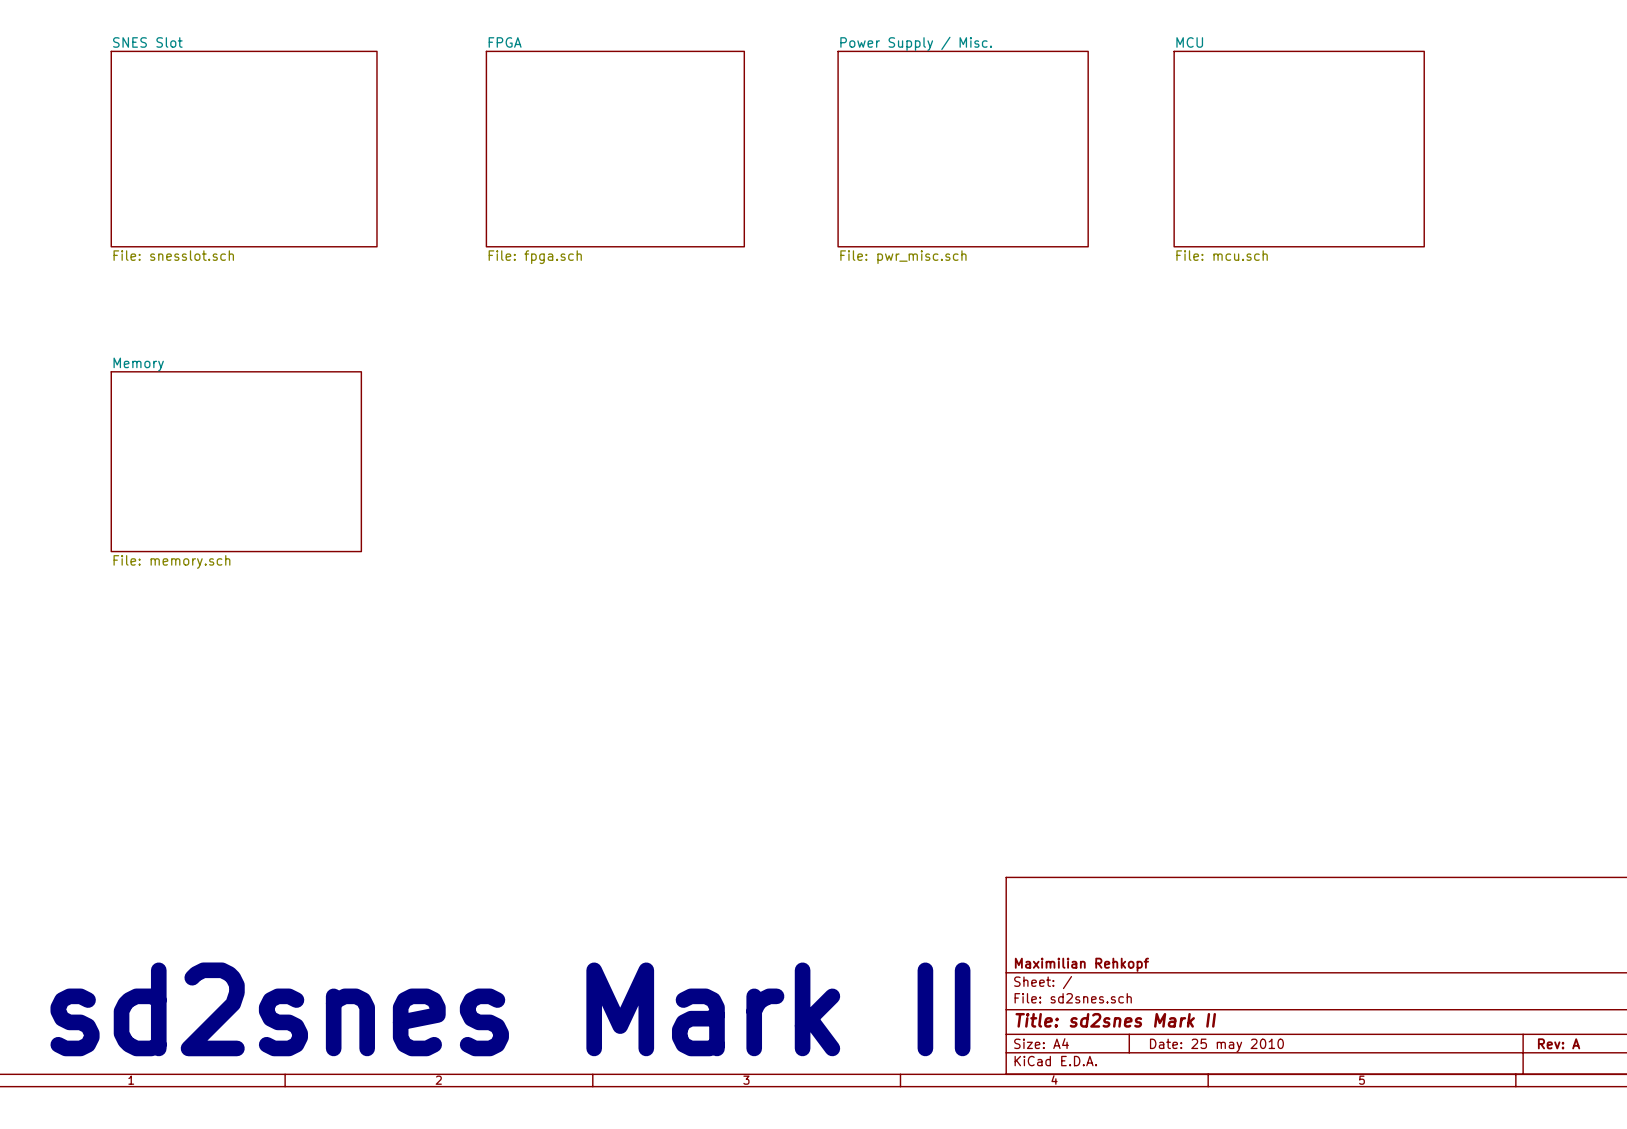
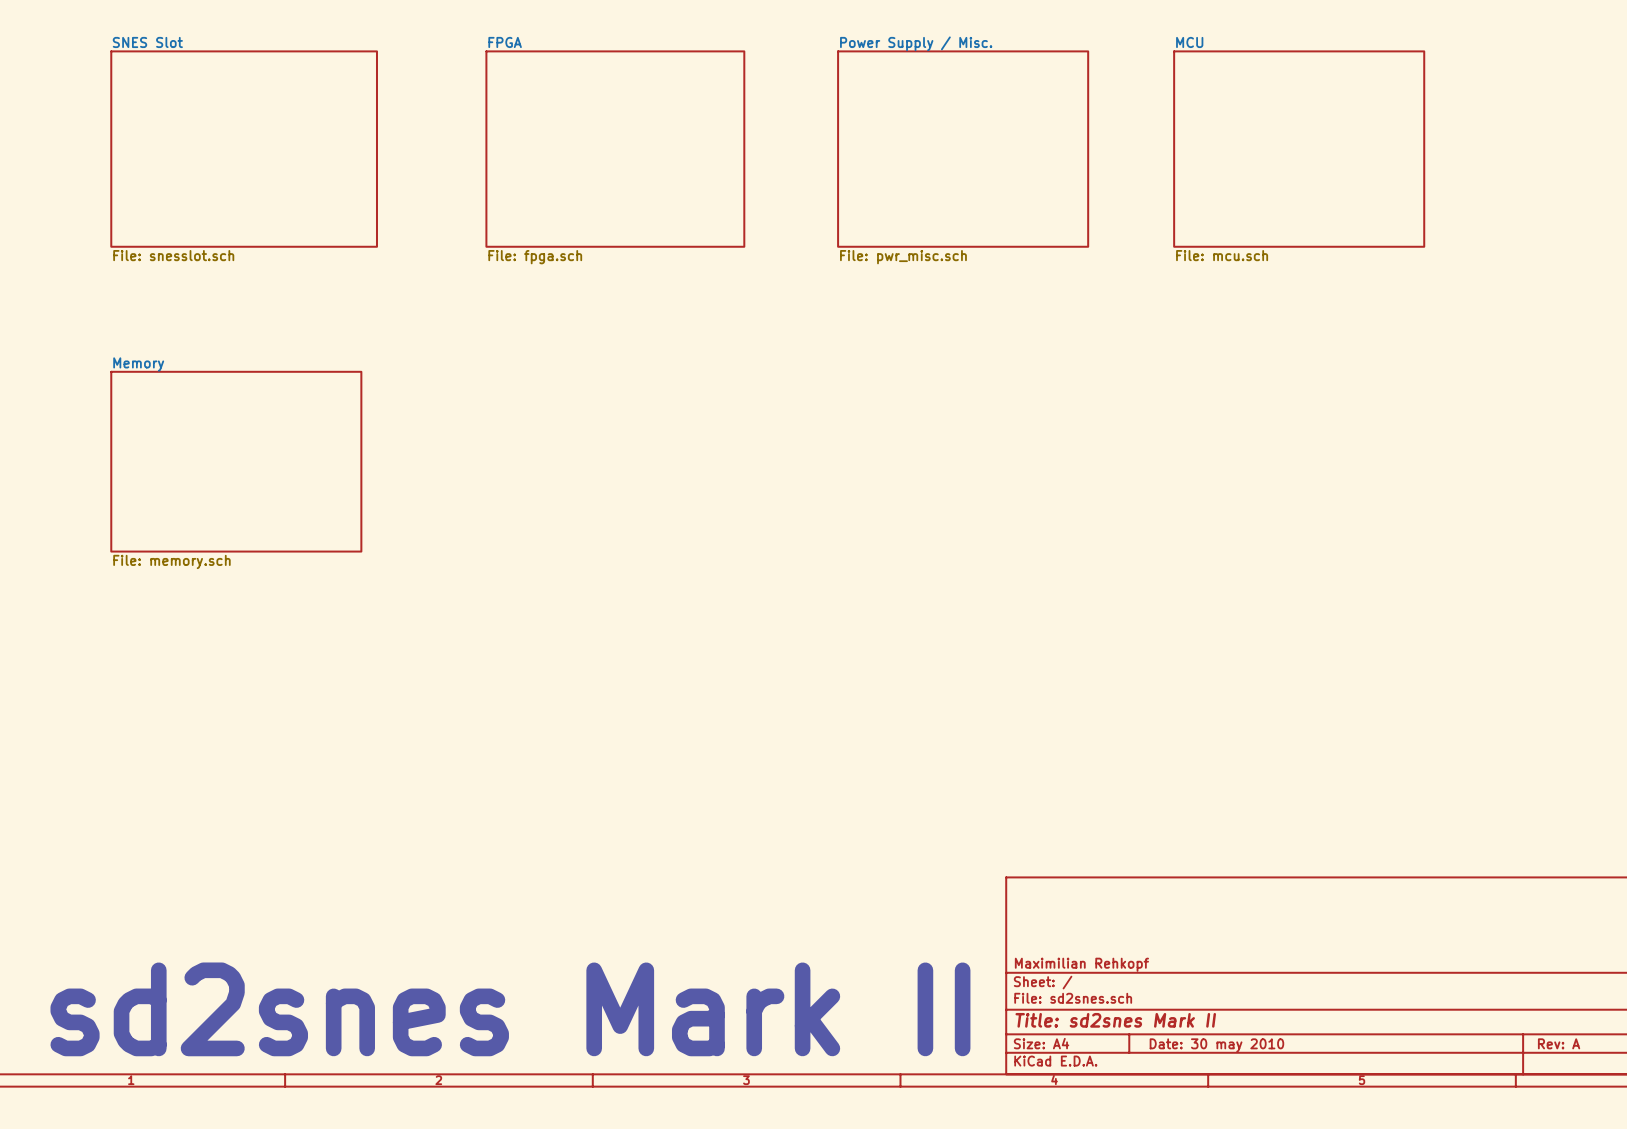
title block: Date: 25 may 2010 (1216, 1045) -> Date: 30 may 2010 (1216, 1045)

